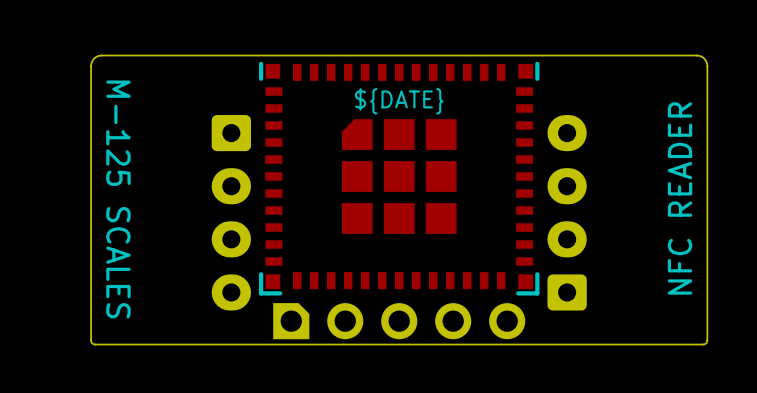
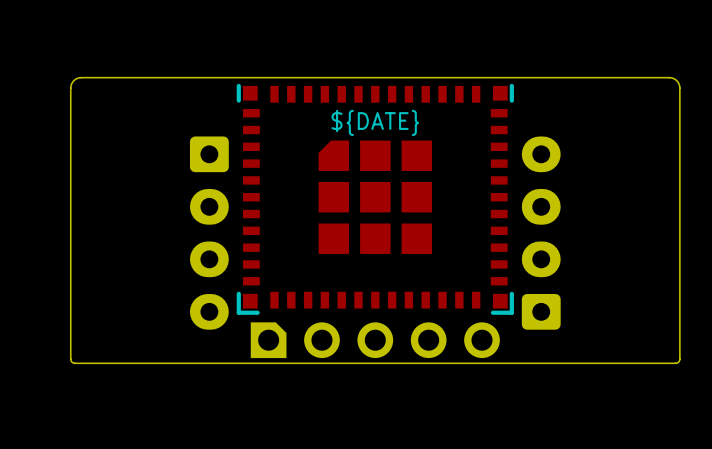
text: NFC READER (680, 198) -> none
text: M-125 SCALES (118, 199) -> none

